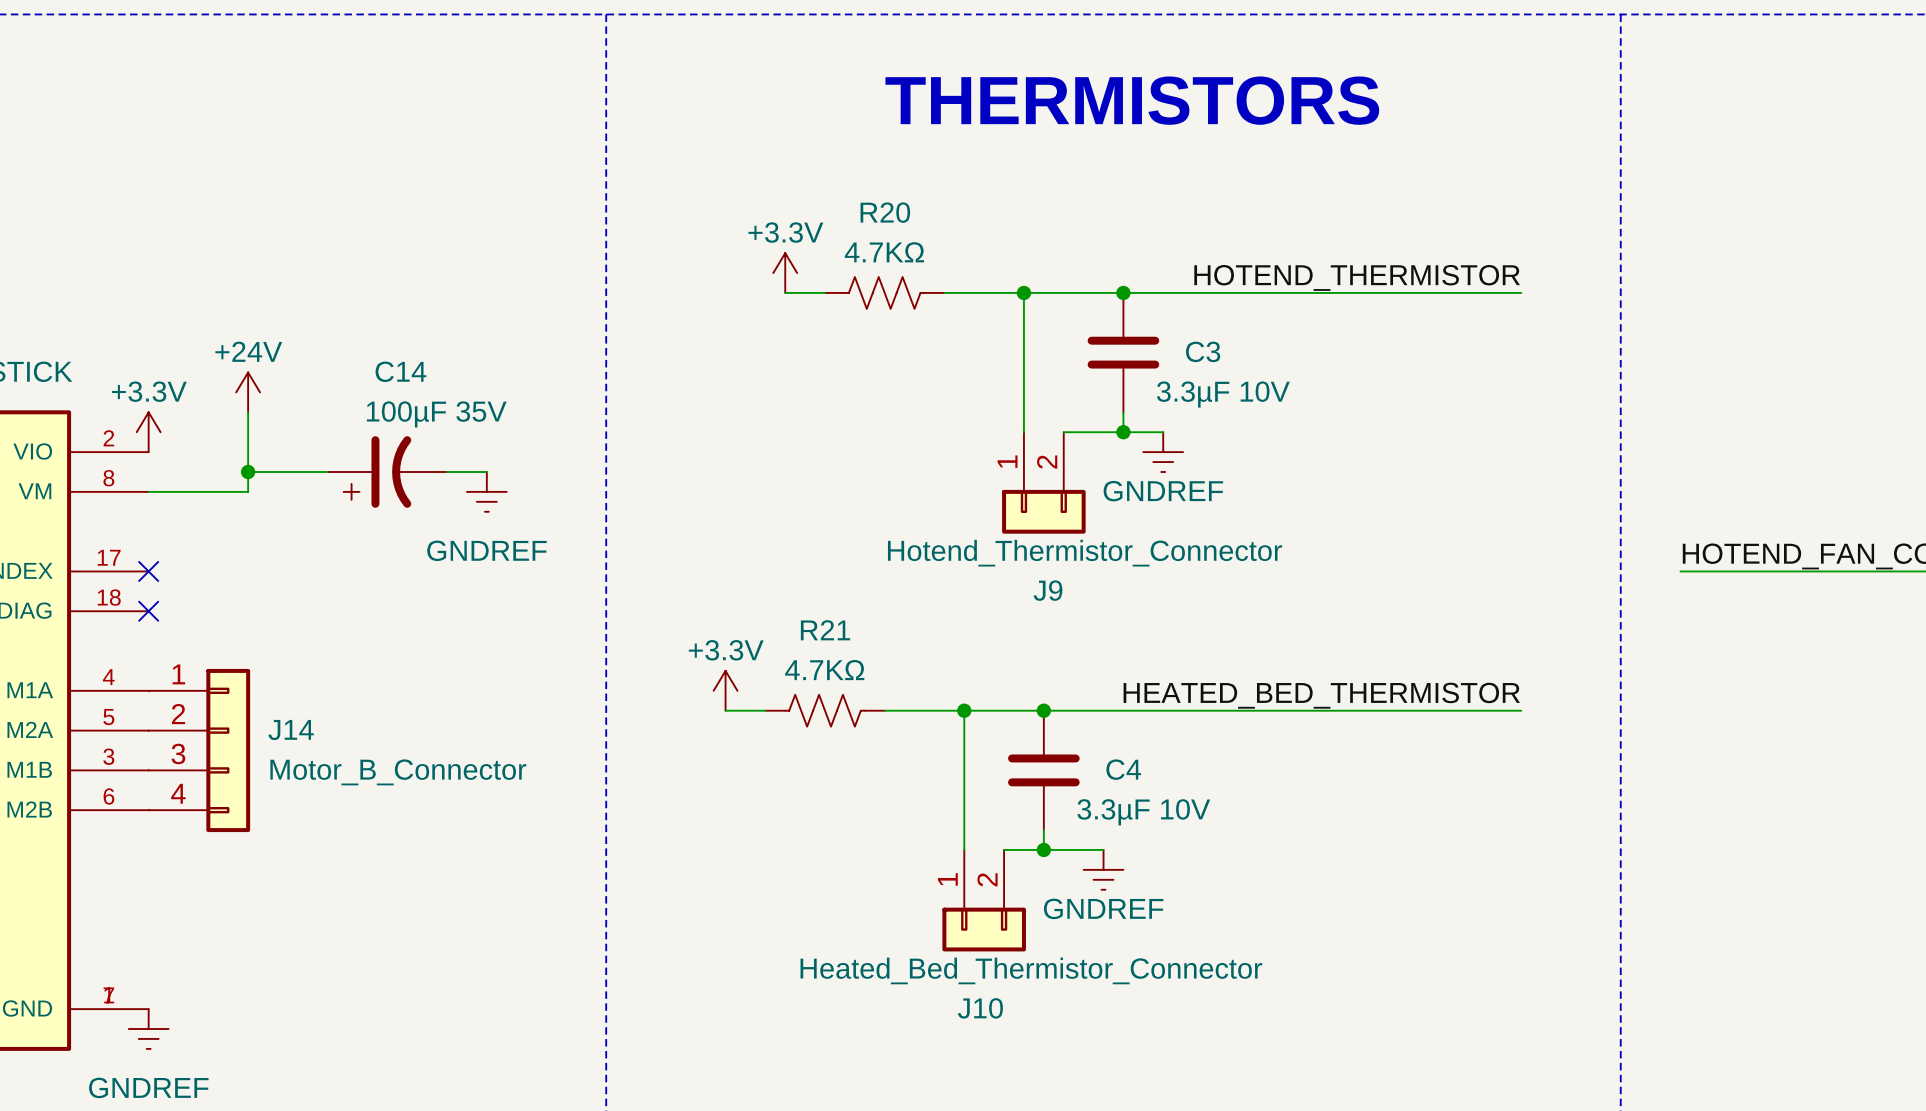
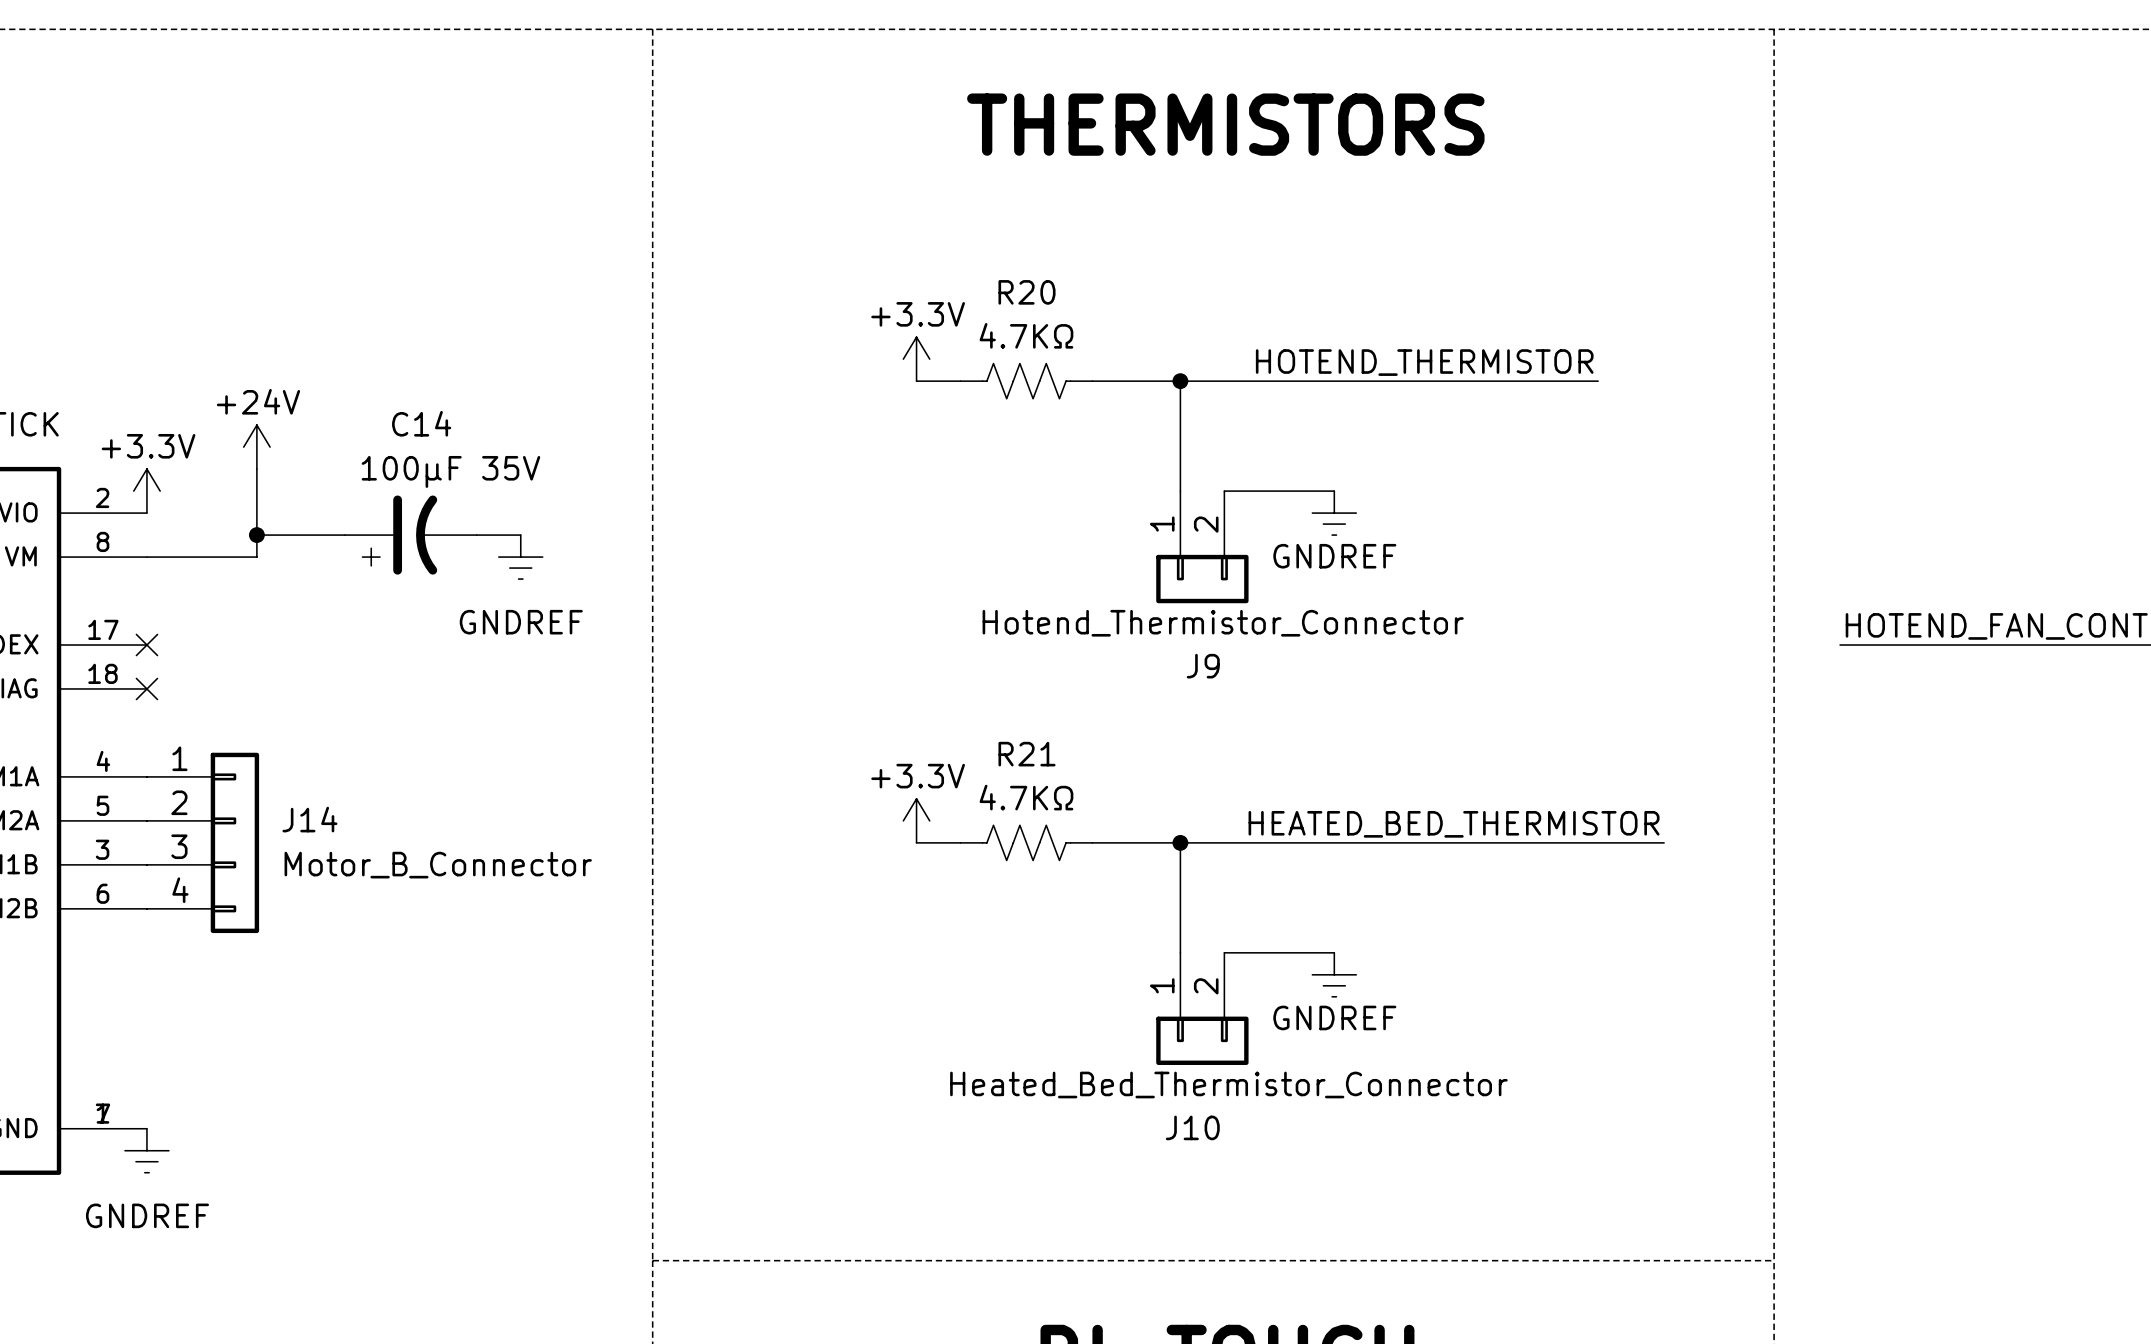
power symbol position: +3.3V (785, 273) -> +3.3V (916, 359)
label position: HOTEND_THERMISTOR (1357, 277) -> HOTEND_THERMISTOR (1424, 362)
wire: (785, 292) (825, 292) -> (916, 381) (960, 381)
R20 position: (884, 292) -> (1026, 381)
wire: (944, 292) (1521, 292) -> none
wire: (1023, 292) (1023, 432) -> none
junction: (1023, 292) -> none
junction: (1123, 292) -> none
wire: none -> (1092, 381) (1598, 381)
wire: none -> (1180, 381) (1180, 491)
junction: none -> (1180, 381)
C3: 3.3µF 10V (1123, 352) -> none
wire: (1123, 412) (1123, 432) (1063, 432) -> none
junction: (1123, 432) -> none
wire: none -> (1268, 491) (1334, 491)
power symbol position: GNDREF (1163, 452) -> GNDREF (1334, 513)
J9 position: (1043, 482) -> (1202, 547)
power symbol position: +3.3V (725, 690) -> +3.3V (916, 820)
label position: HEATED_BED_THERMISTOR (1321, 695) -> HEATED_BED_THERMISTOR (1454, 824)
wire: (725, 710) (765, 710) -> (916, 842) (960, 842)
R21 position: (825, 710) -> (1026, 842)
wire: (884, 710) (1521, 710) -> none
wire: (964, 710) (964, 849) -> none
junction: (964, 710) -> none
junction: (1043, 710) -> none
wire: none -> (1092, 842) (1664, 842)
wire: none -> (1180, 842) (1180, 952)
junction: none -> (1180, 842)
C4: 3.3µF 10V (1043, 770) -> none
wire: (1043, 830) (1043, 849) -> none
wire: (1004, 849) (1103, 849) -> (1224, 952) (1334, 952)
junction: (1043, 849) -> none
power symbol position: GNDREF (1103, 869) -> GNDREF (1334, 974)
J10 position: (984, 900) -> (1202, 1008)

